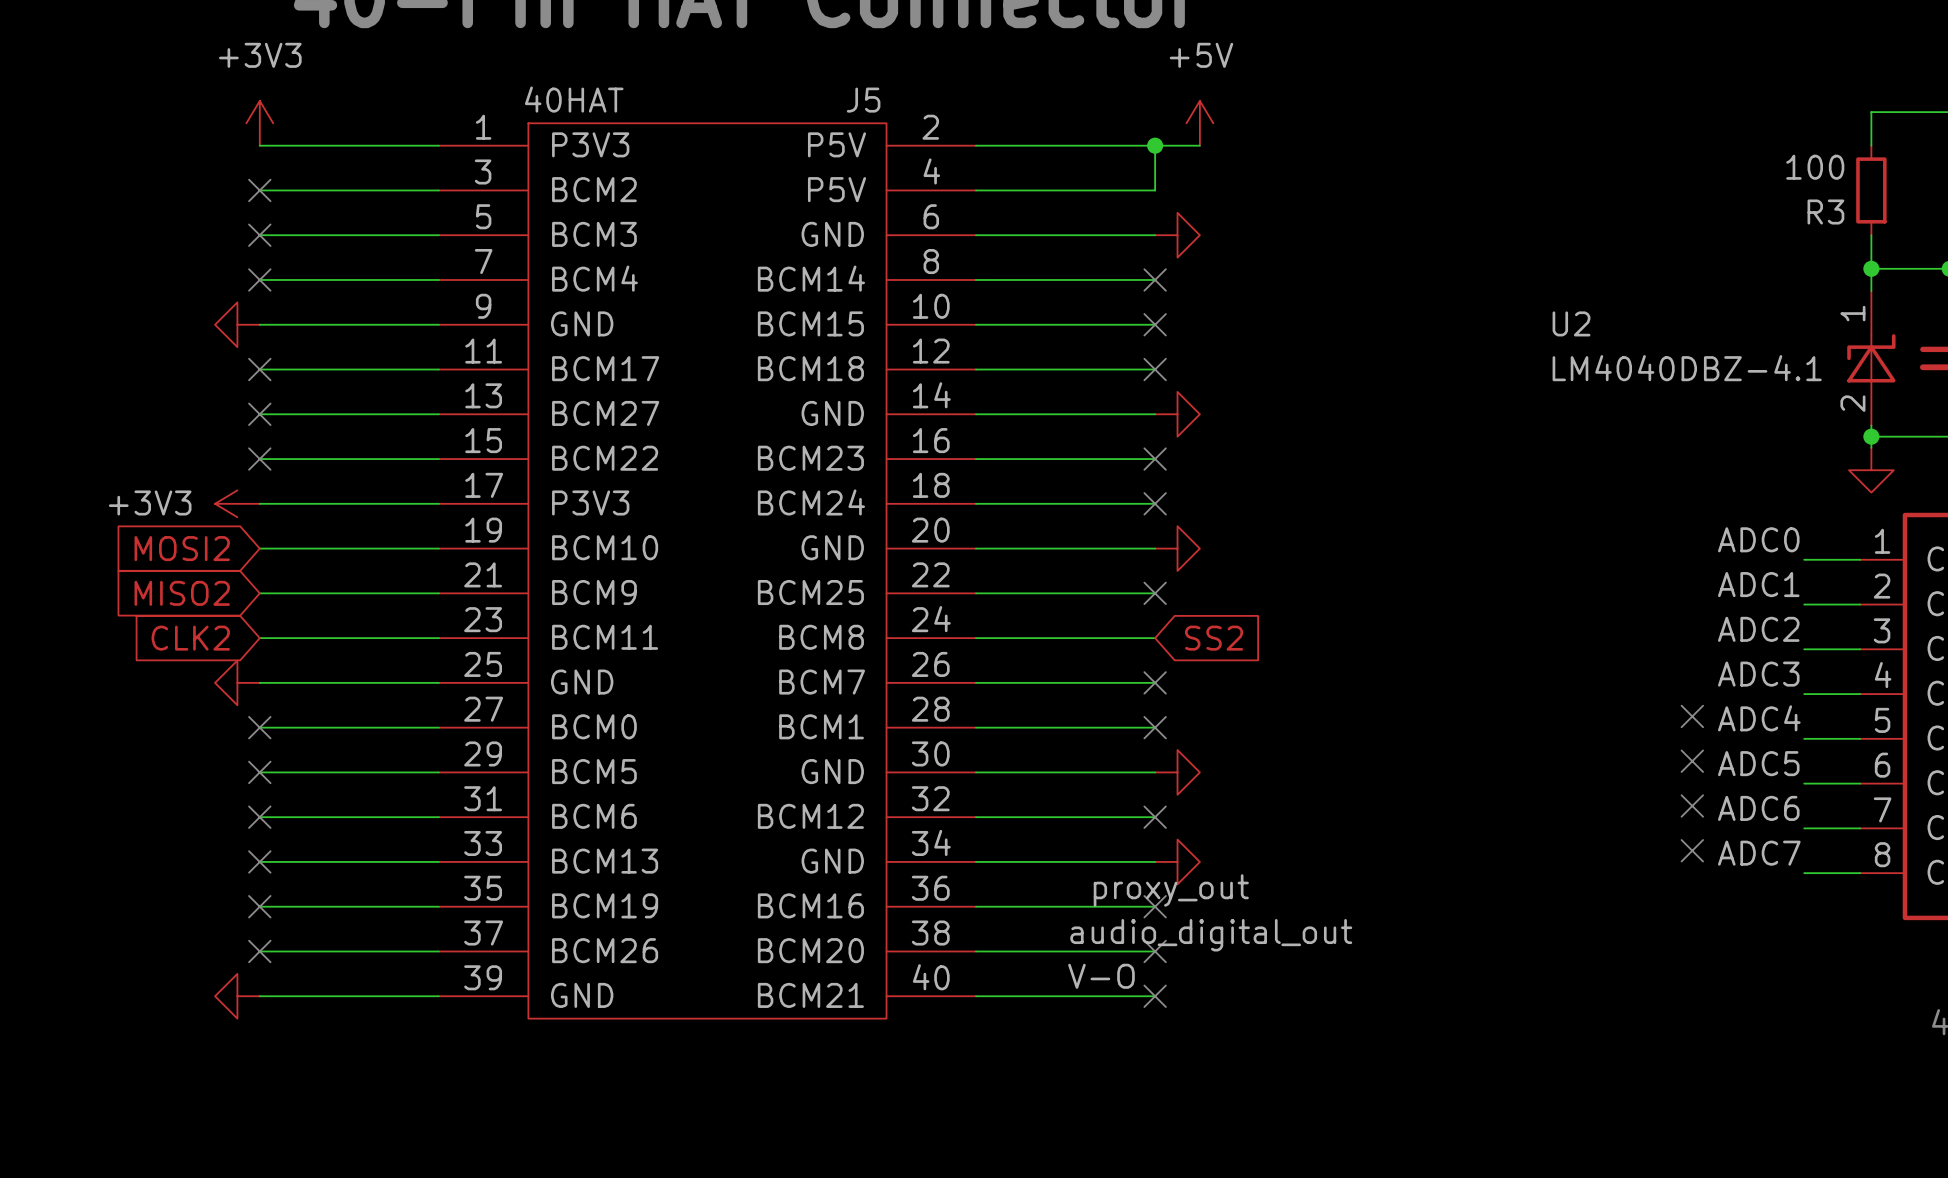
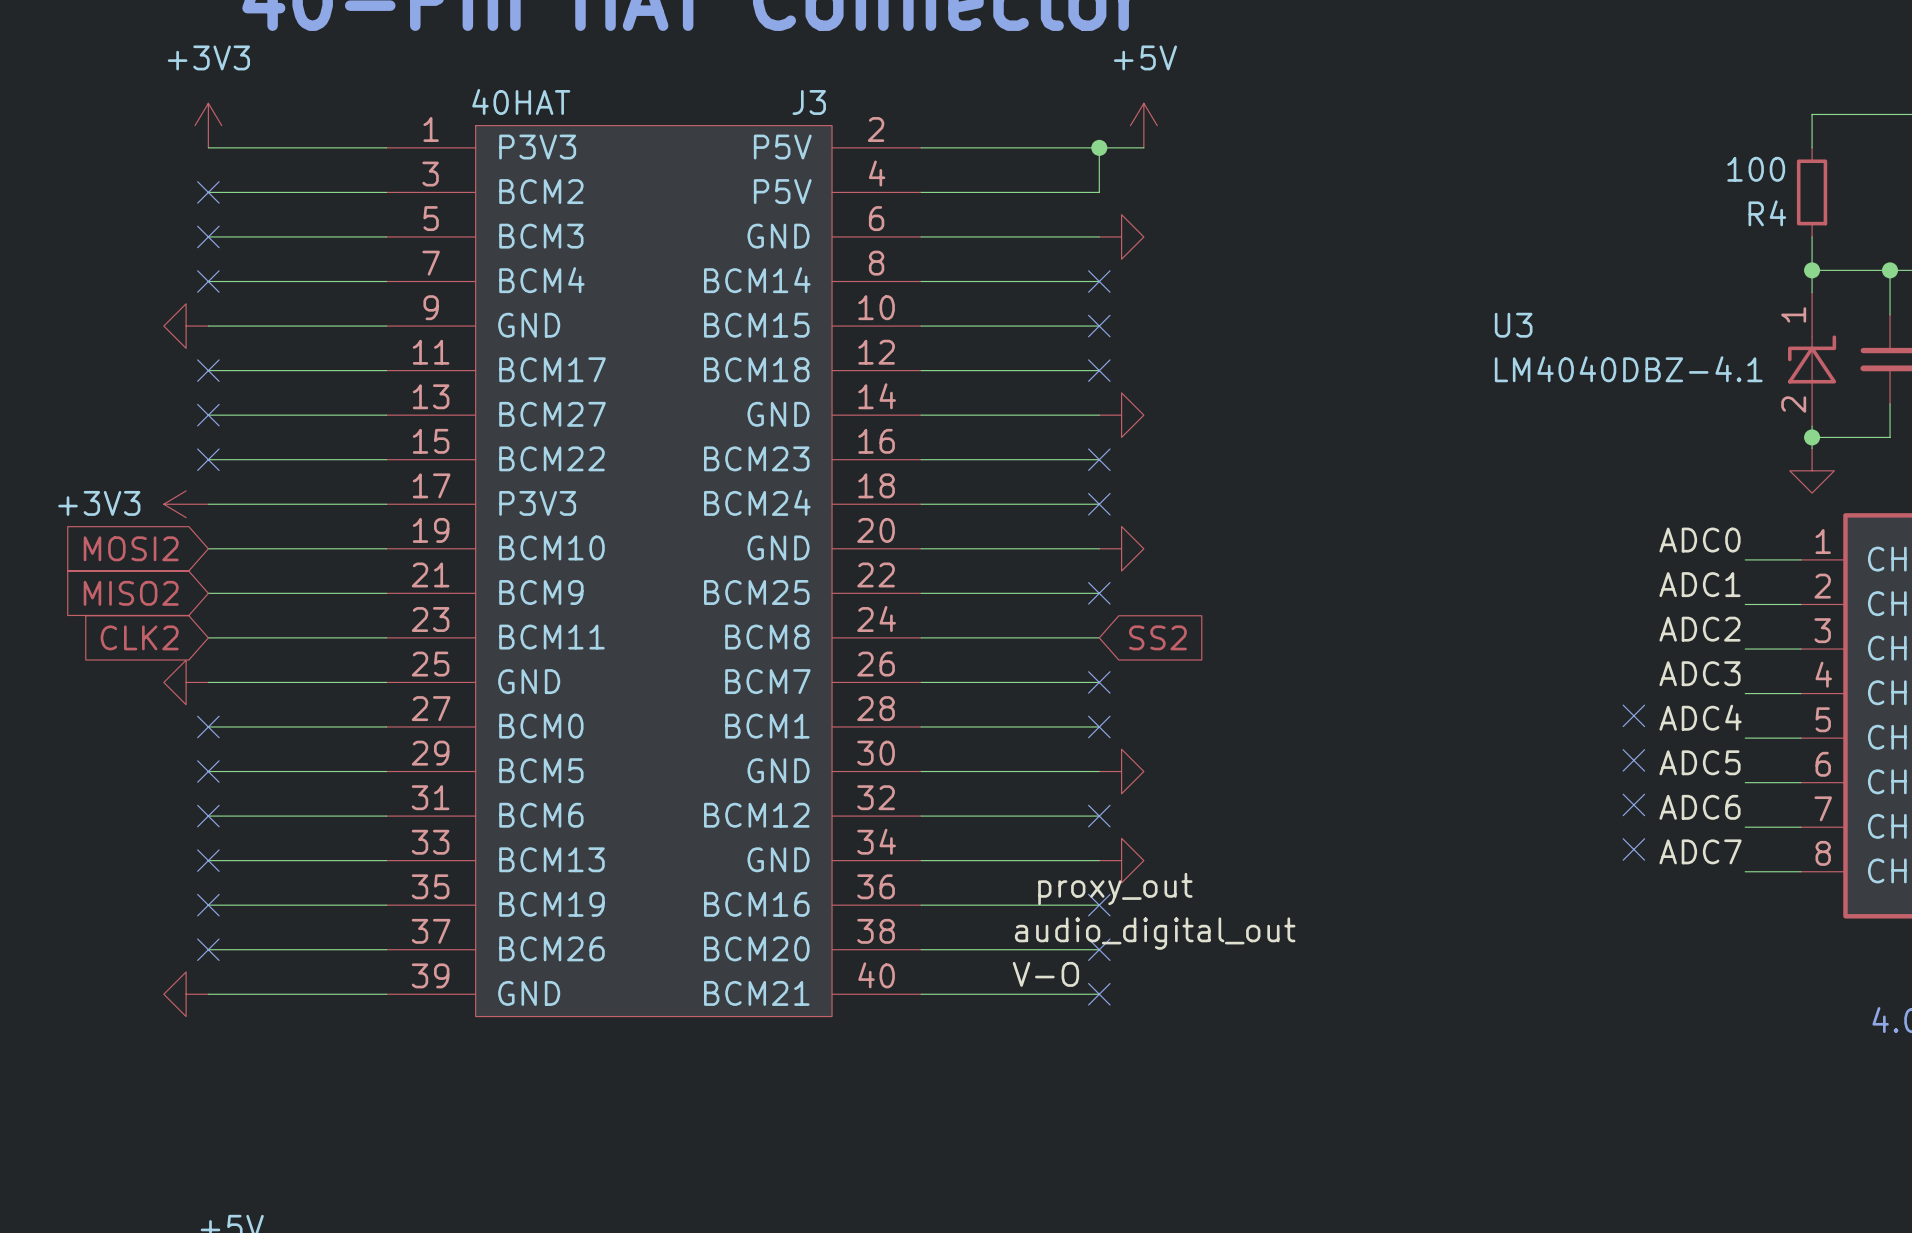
J5 name: J5 (863, 100) -> J3 (809, 102)
R3 name: R3 (1825, 212) -> R4 (1767, 213)
U2 name: U2 (1571, 323) -> U3 (1513, 325)

